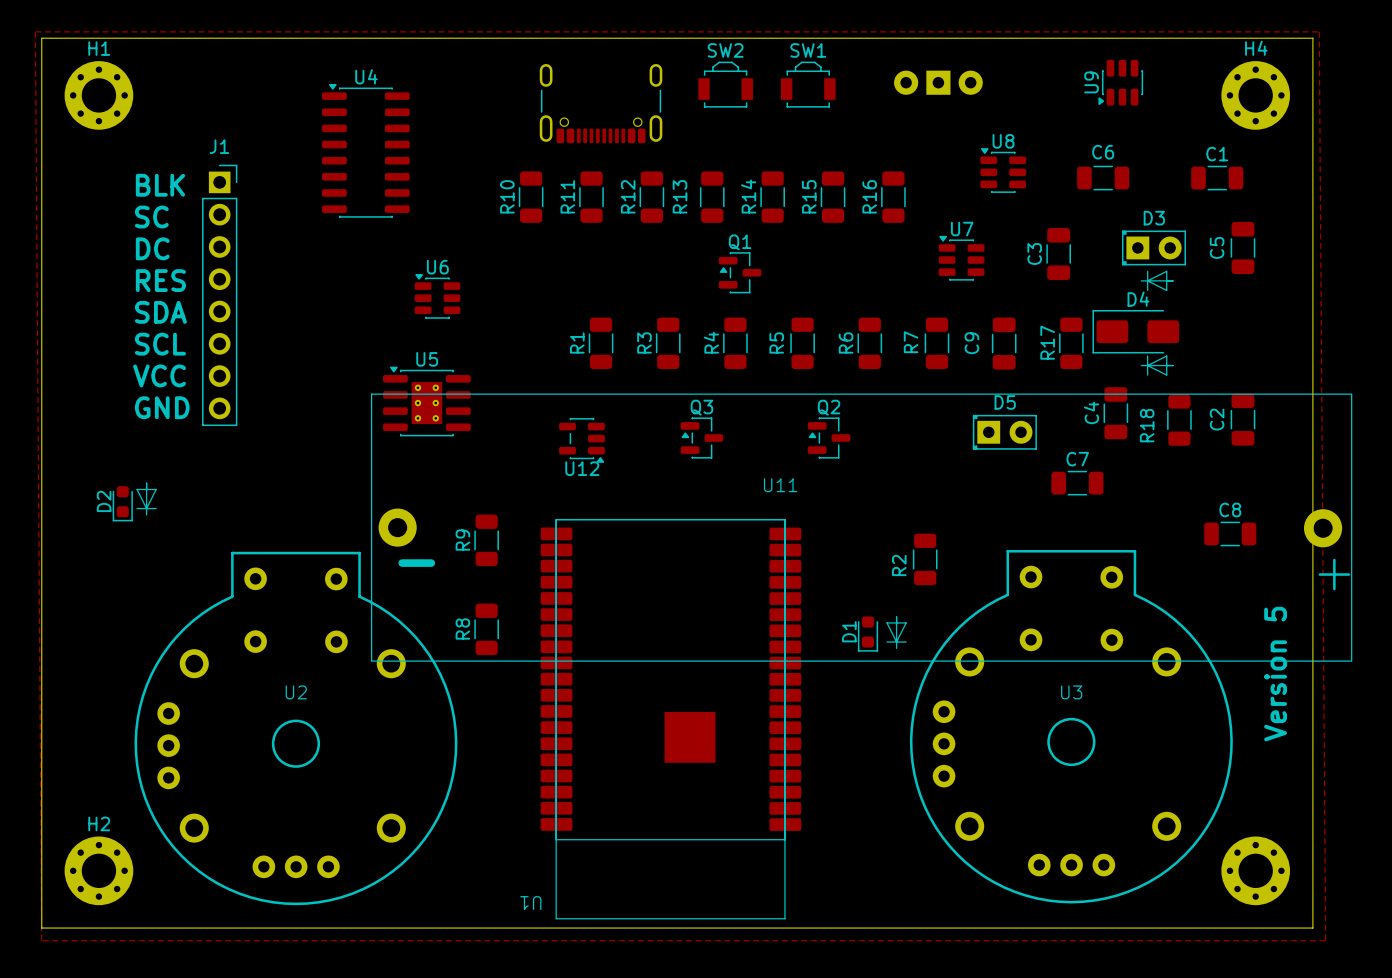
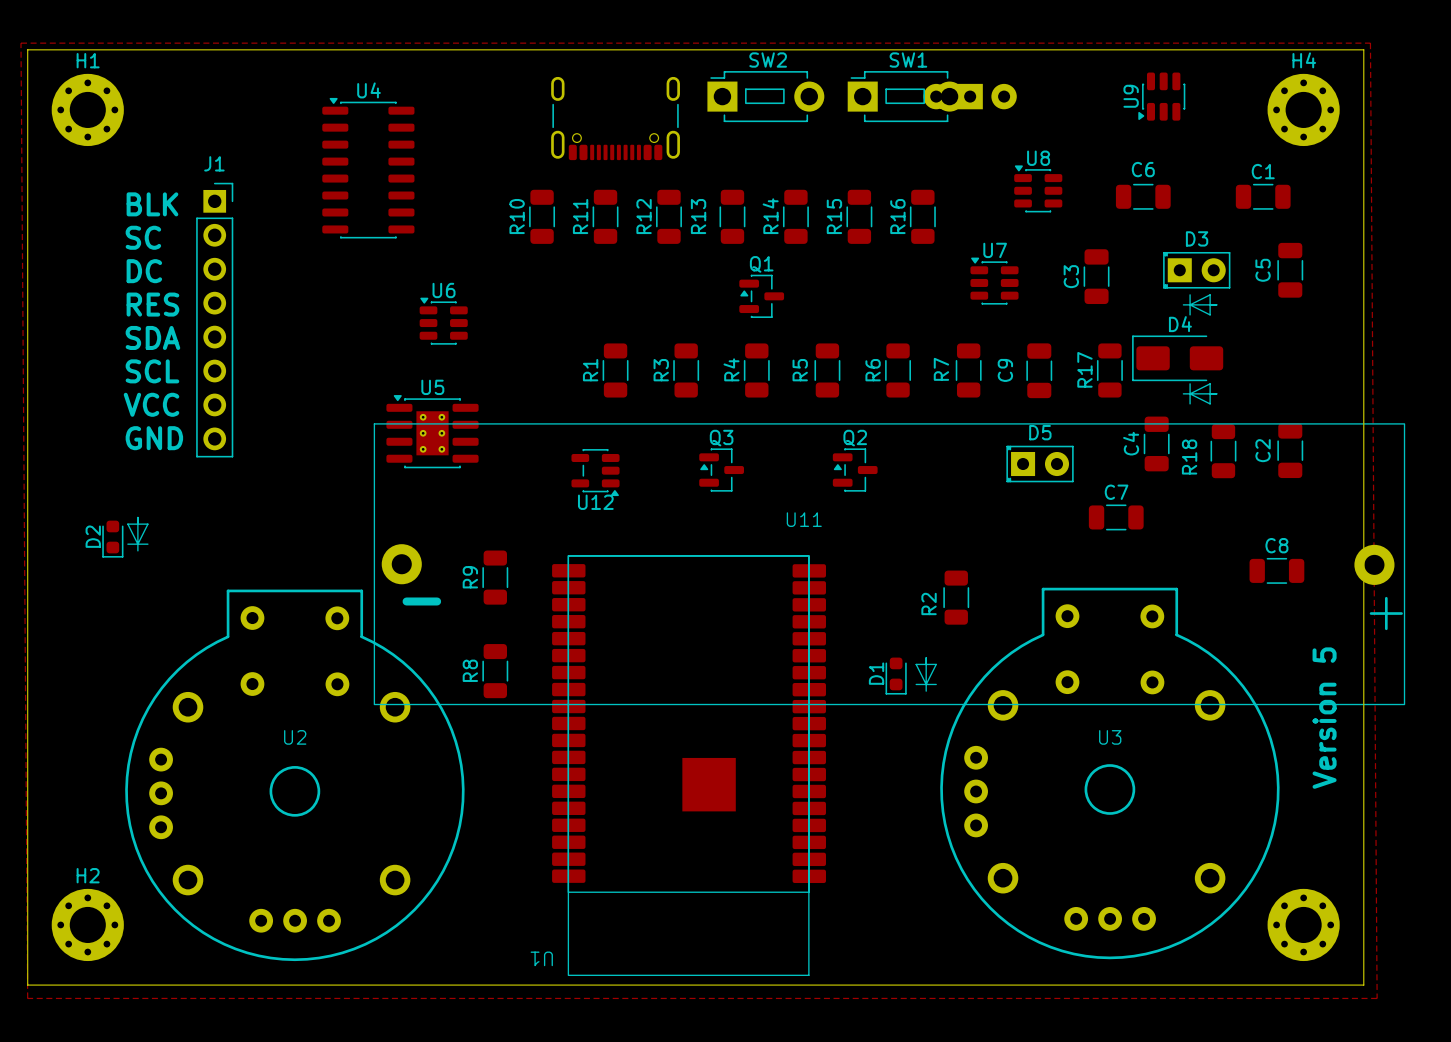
SW2 footprint: [698, 61, 753, 108] -> [707, 71, 825, 123]
SW1 footprint: [780, 61, 836, 108] -> [847, 71, 965, 123]

